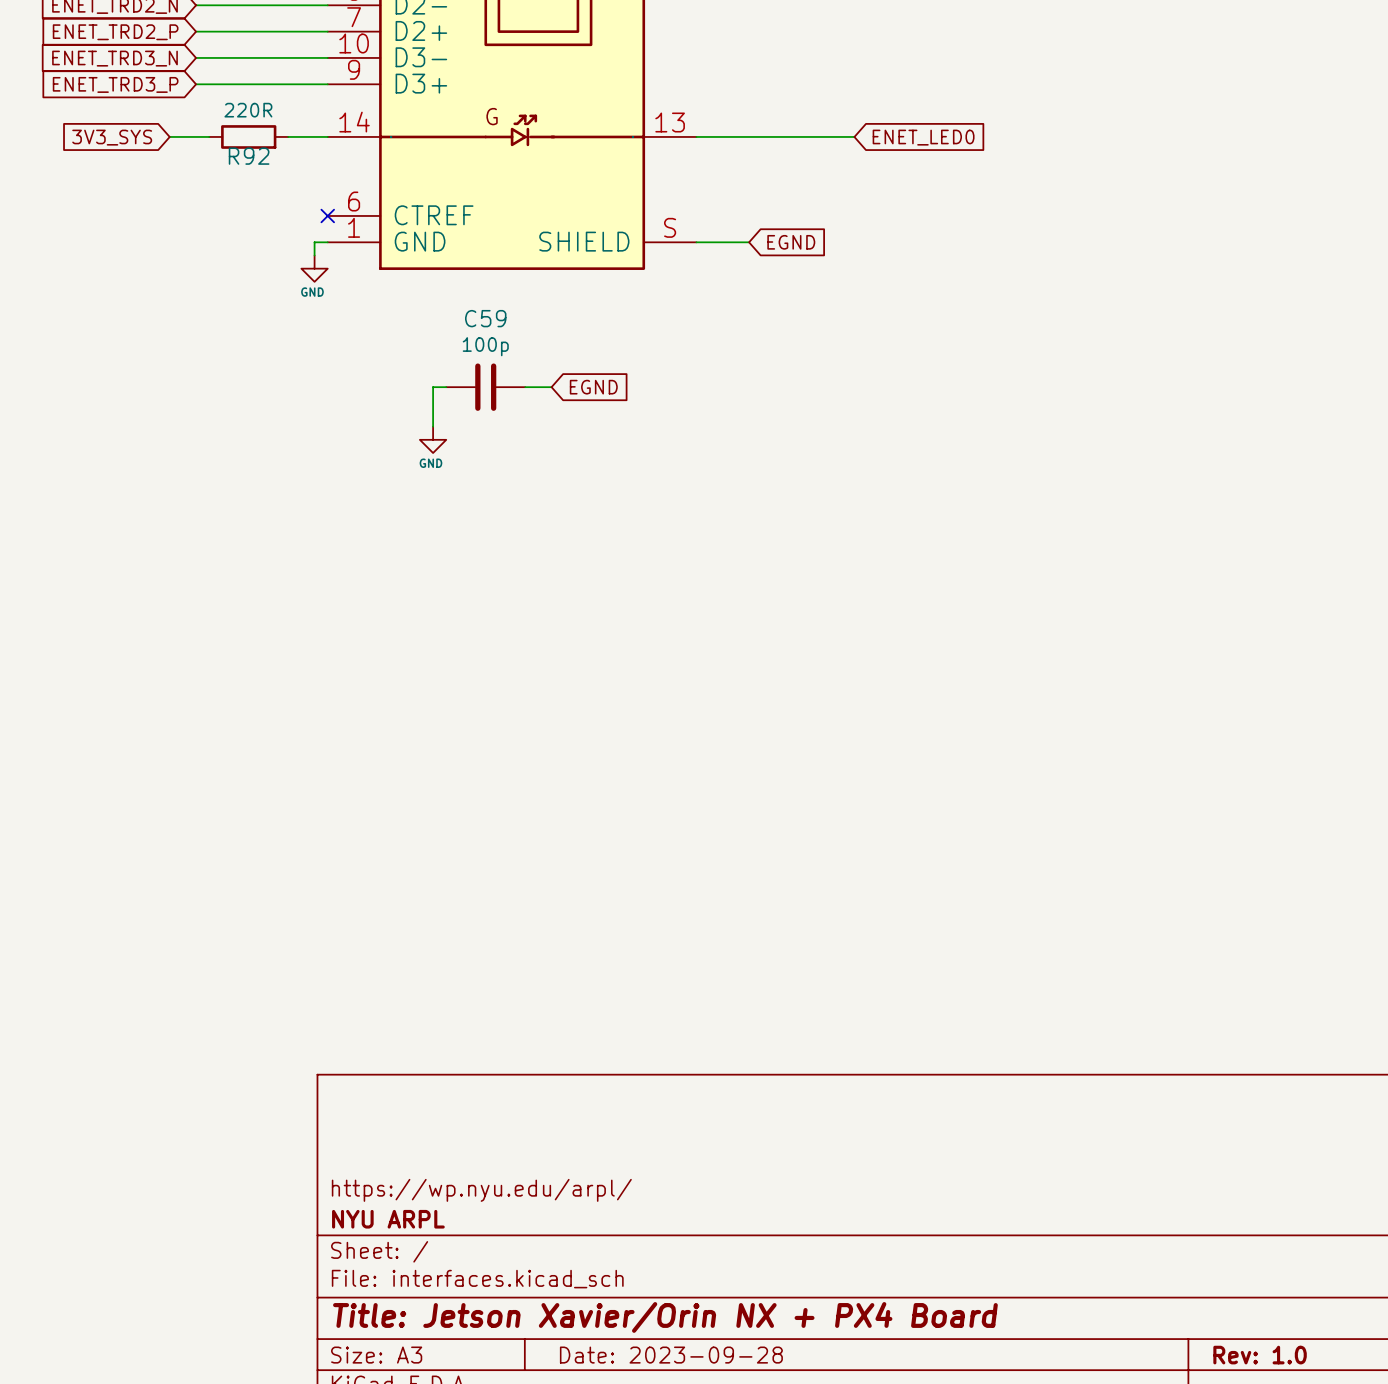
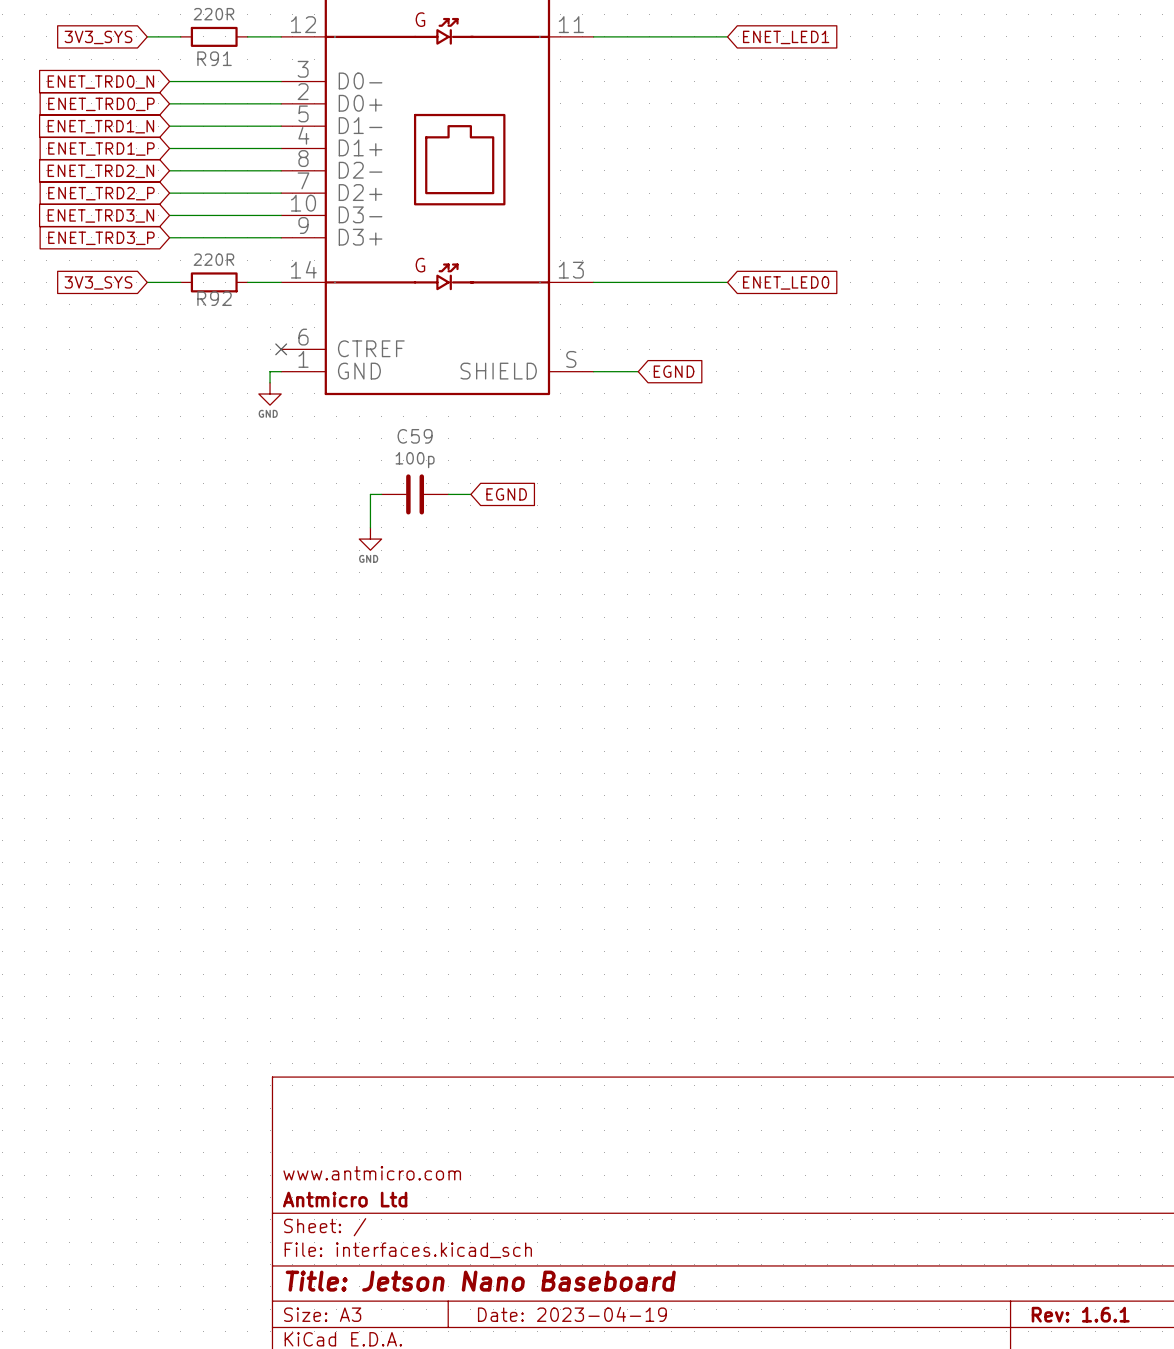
title block: https://wp.nyu.edu/arpl/ (481, 1190) -> www.antmicro.com (372, 1173)
title block: NYU ARPL (388, 1219) -> Antmicro Ltd (345, 1199)
title block: Title: Jetson Xavier/Orin NX + PX4 Board (665, 1317) -> Title: Jetson Nano Baseboard (480, 1281)
title block: Date: 2023-09-28 (671, 1355) -> Date: 2023-04-19 (572, 1314)
title block: Rev: 1.0 (1260, 1355) -> Rev: 1.6.1 (1080, 1314)

